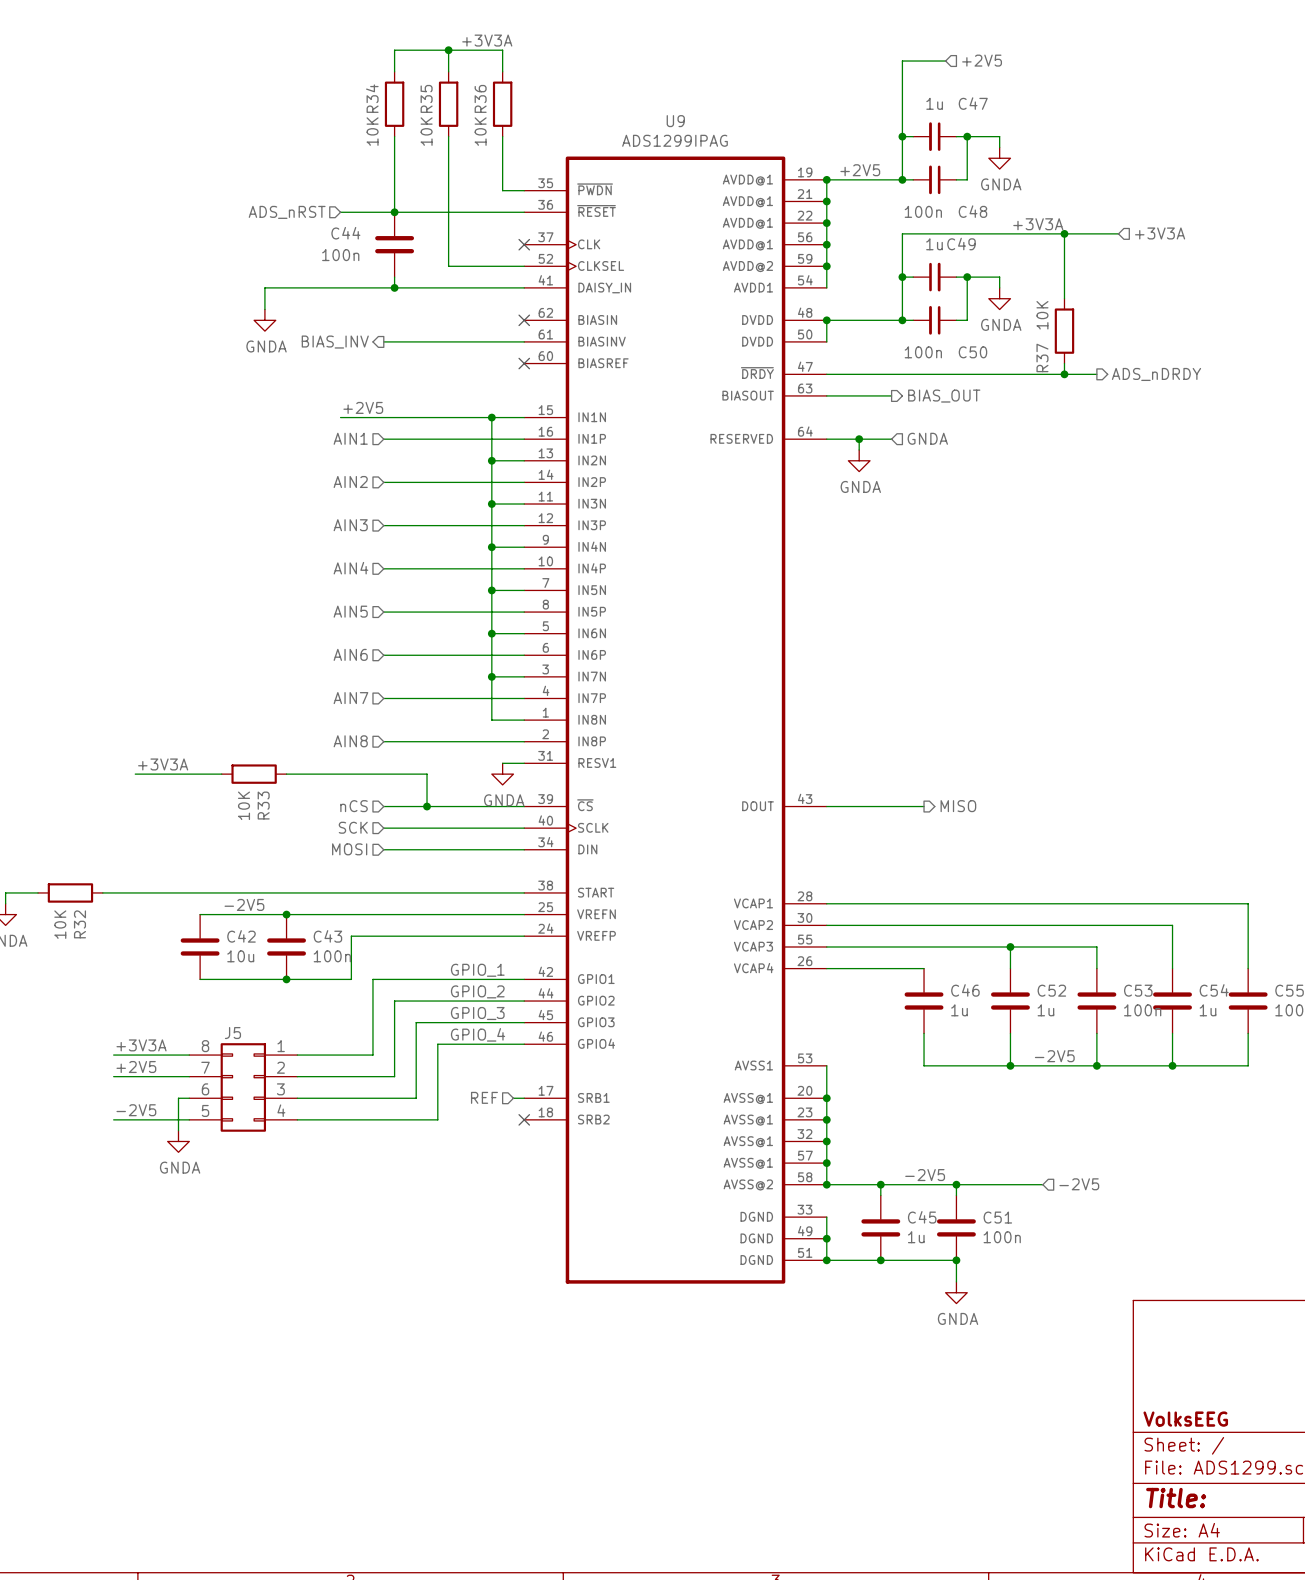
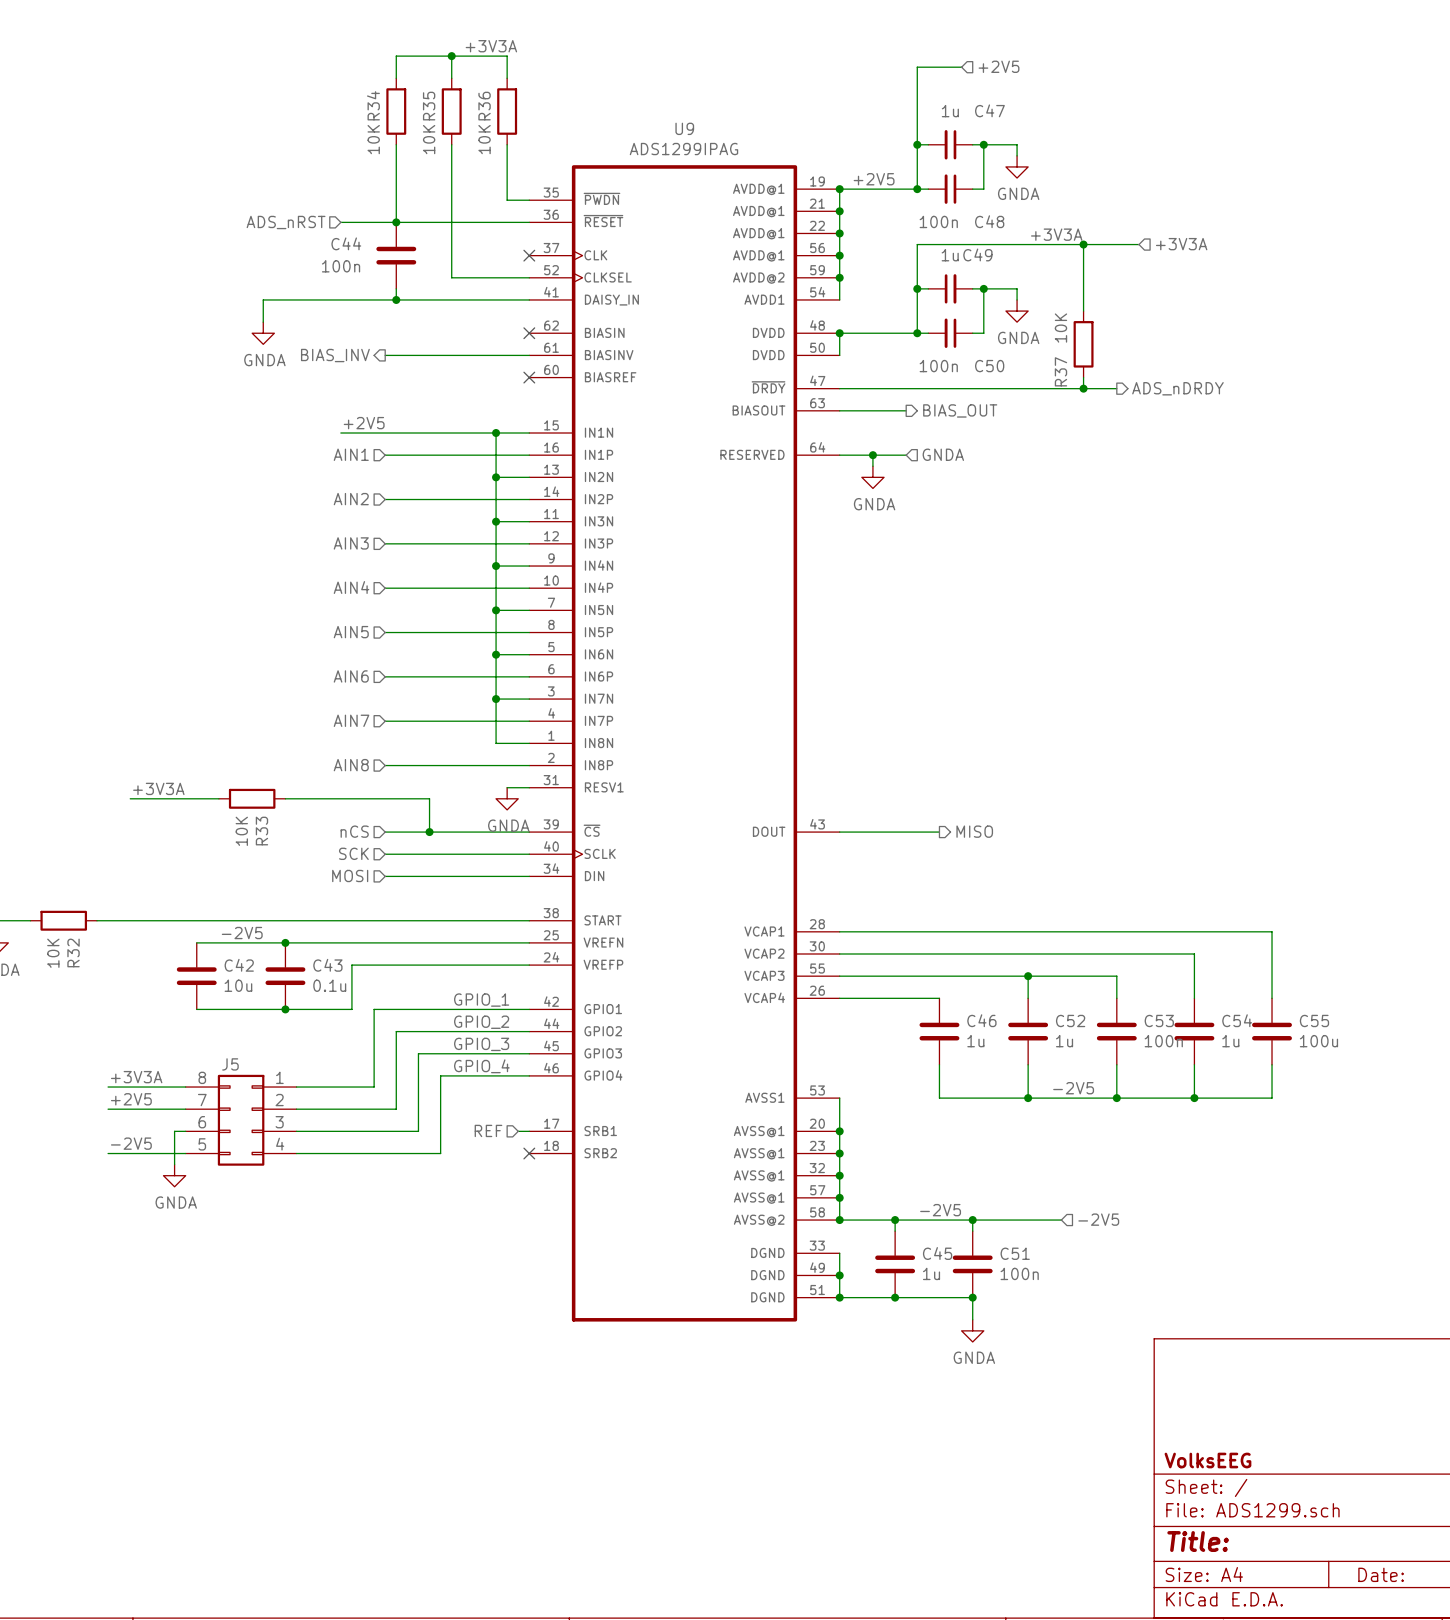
C43 value: 100n (332, 956) -> 0.1u (329, 985)

